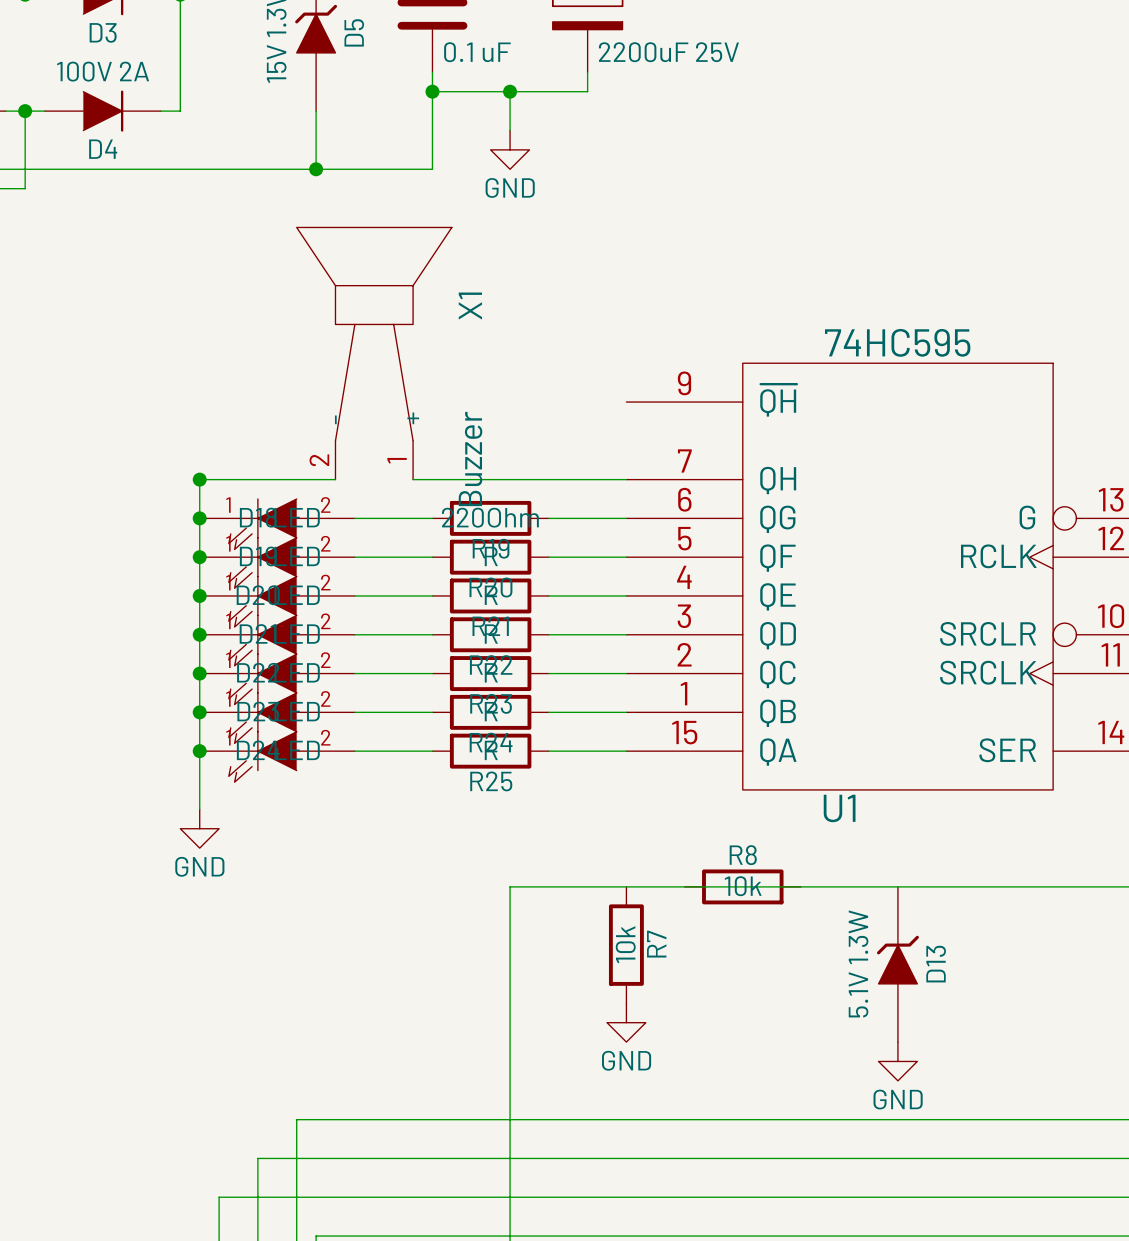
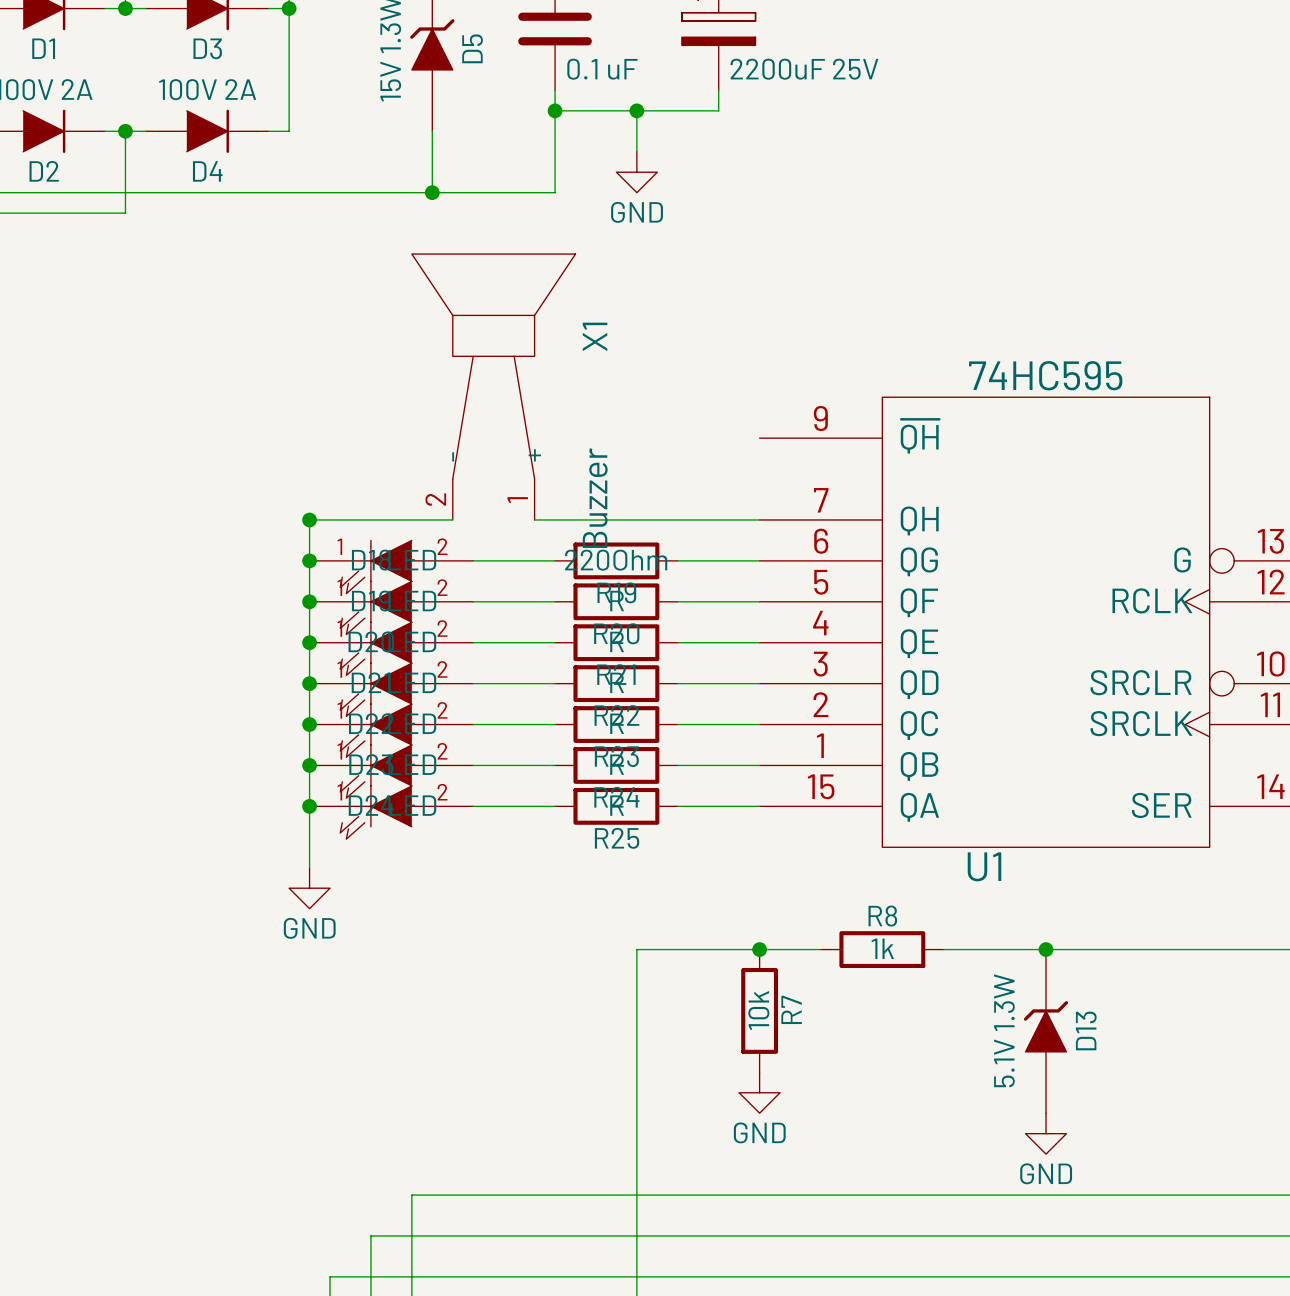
junction: none -> (759, 949)
wire: (684, 886) (800, 886) -> none
R8 value: 10k (743, 886) -> 1k (882, 948)
junction: none -> (1046, 949)

